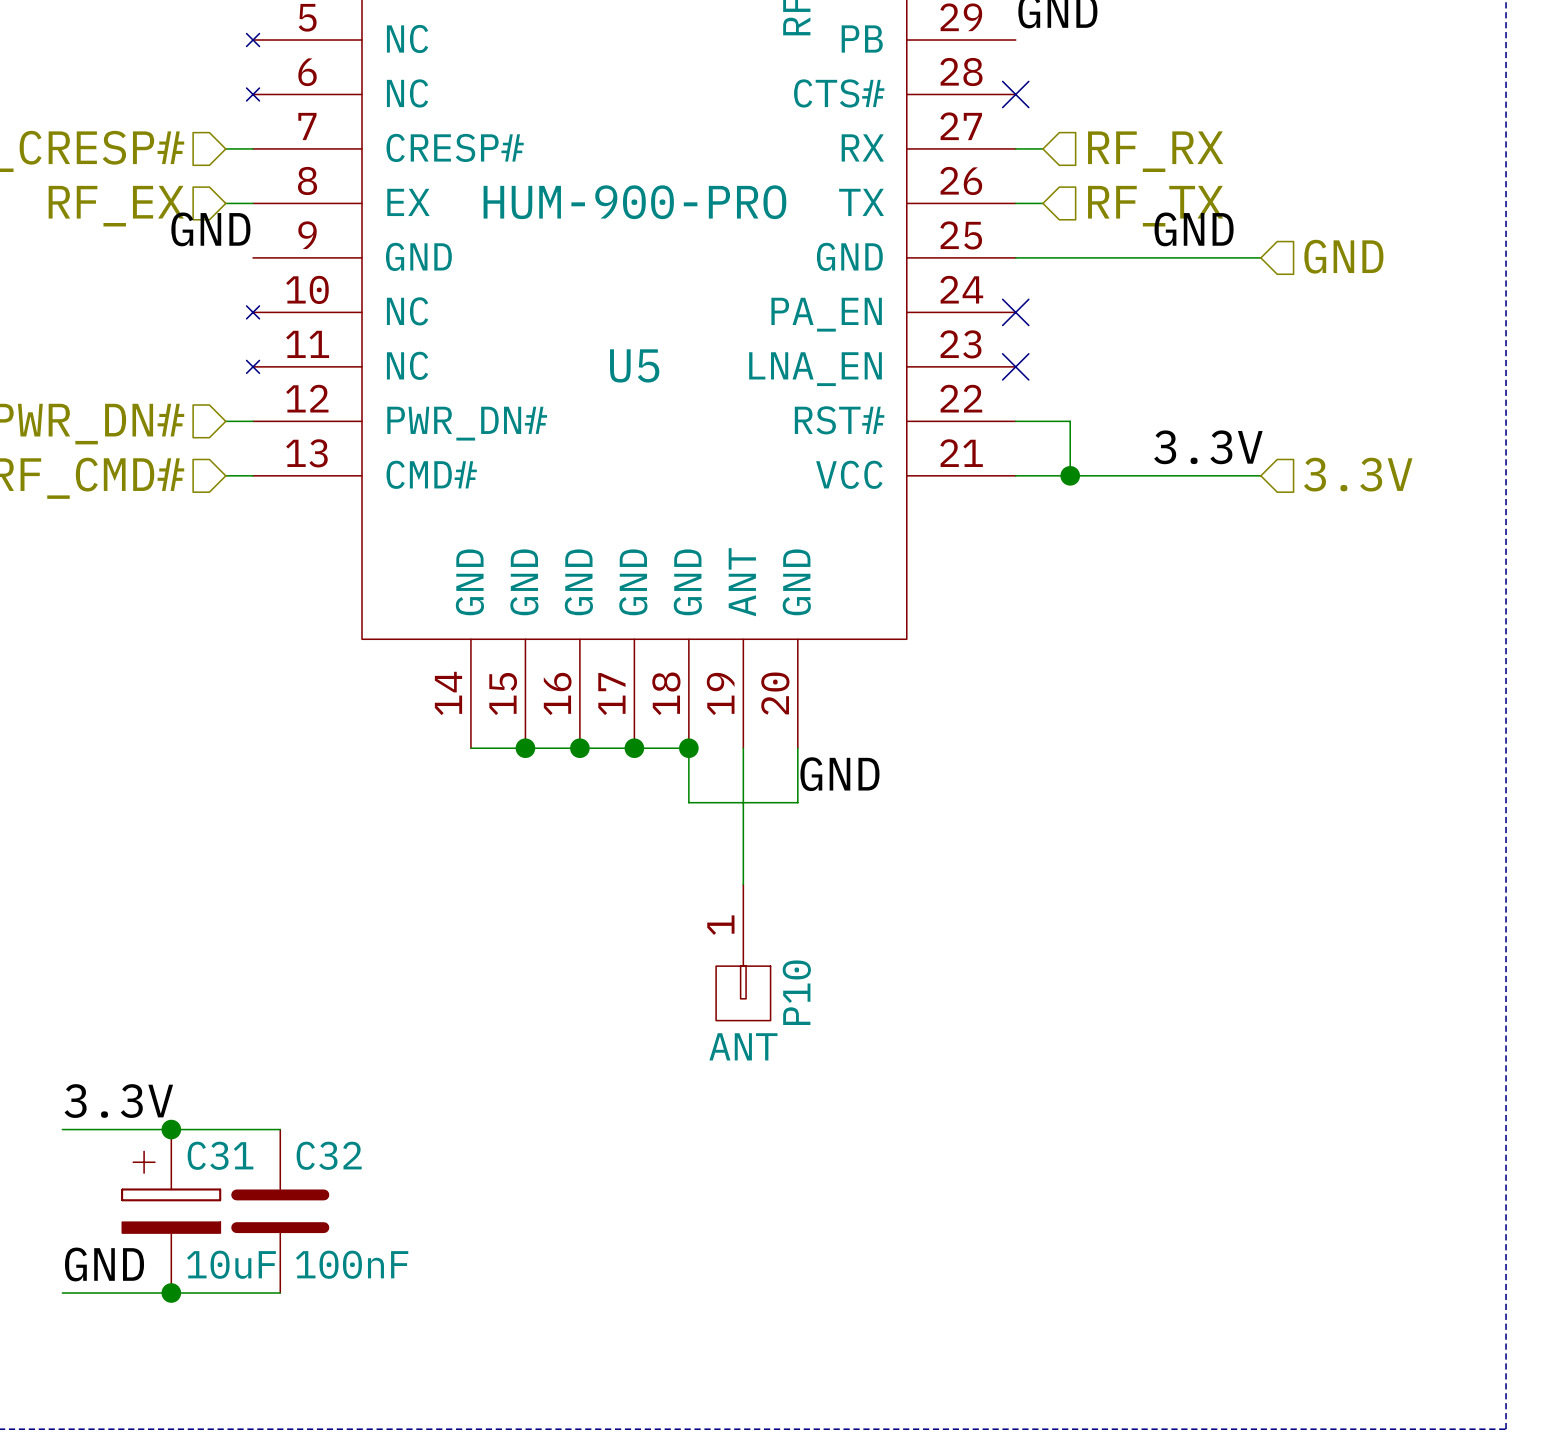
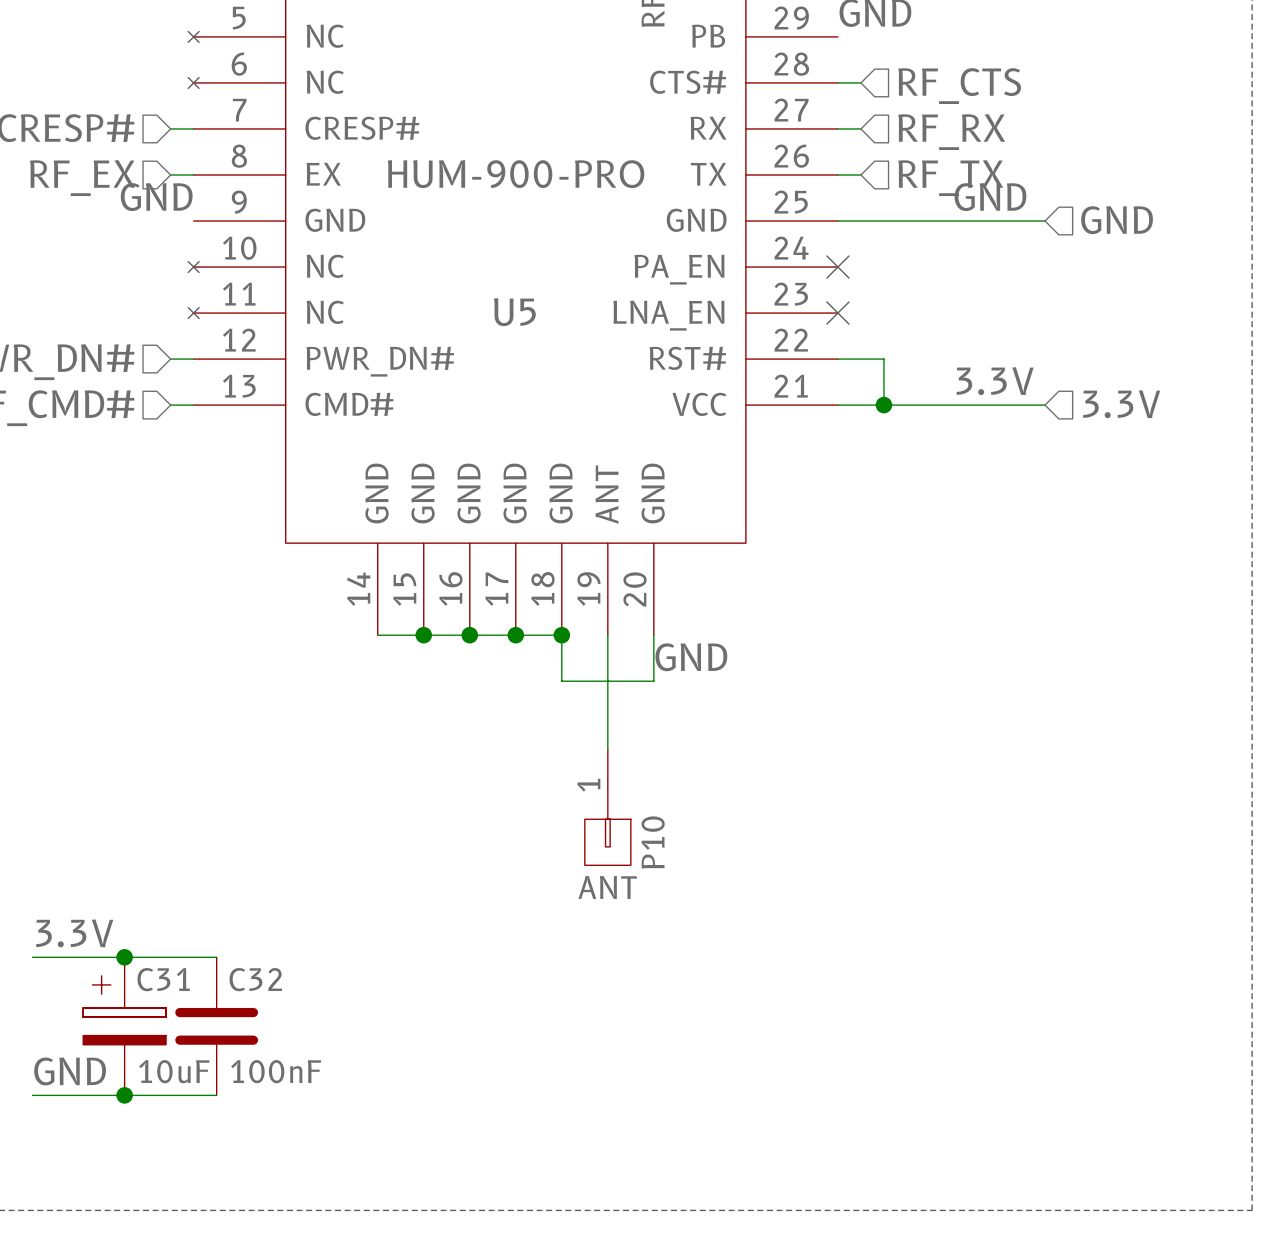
wire: none -> (837, 82) (860, 82)
no-connect mark: (1015, 94) -> none
hierarchical label: none -> RF_CTS (959, 86)

